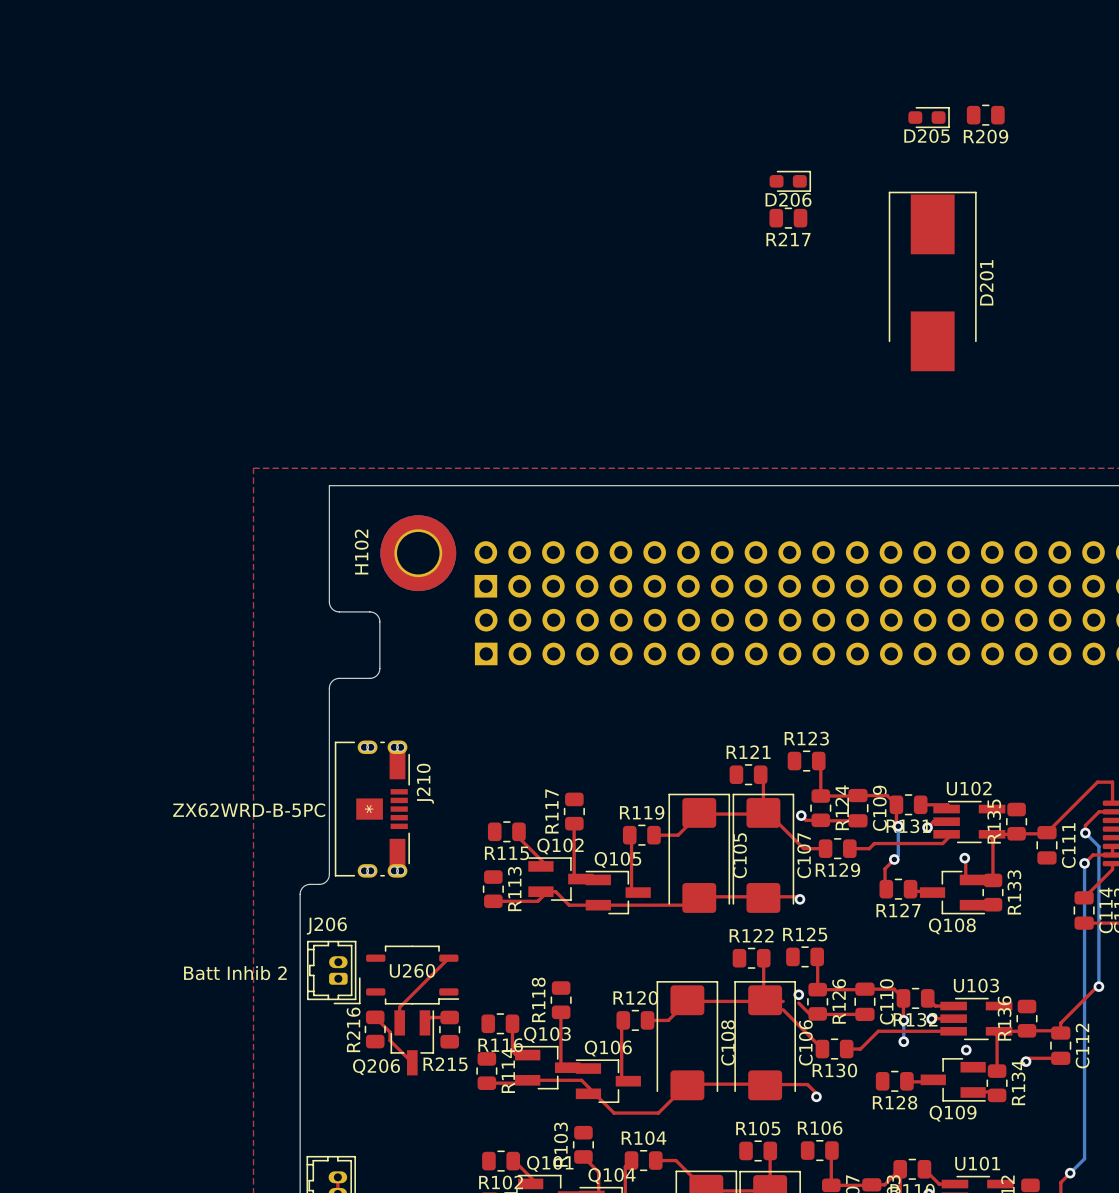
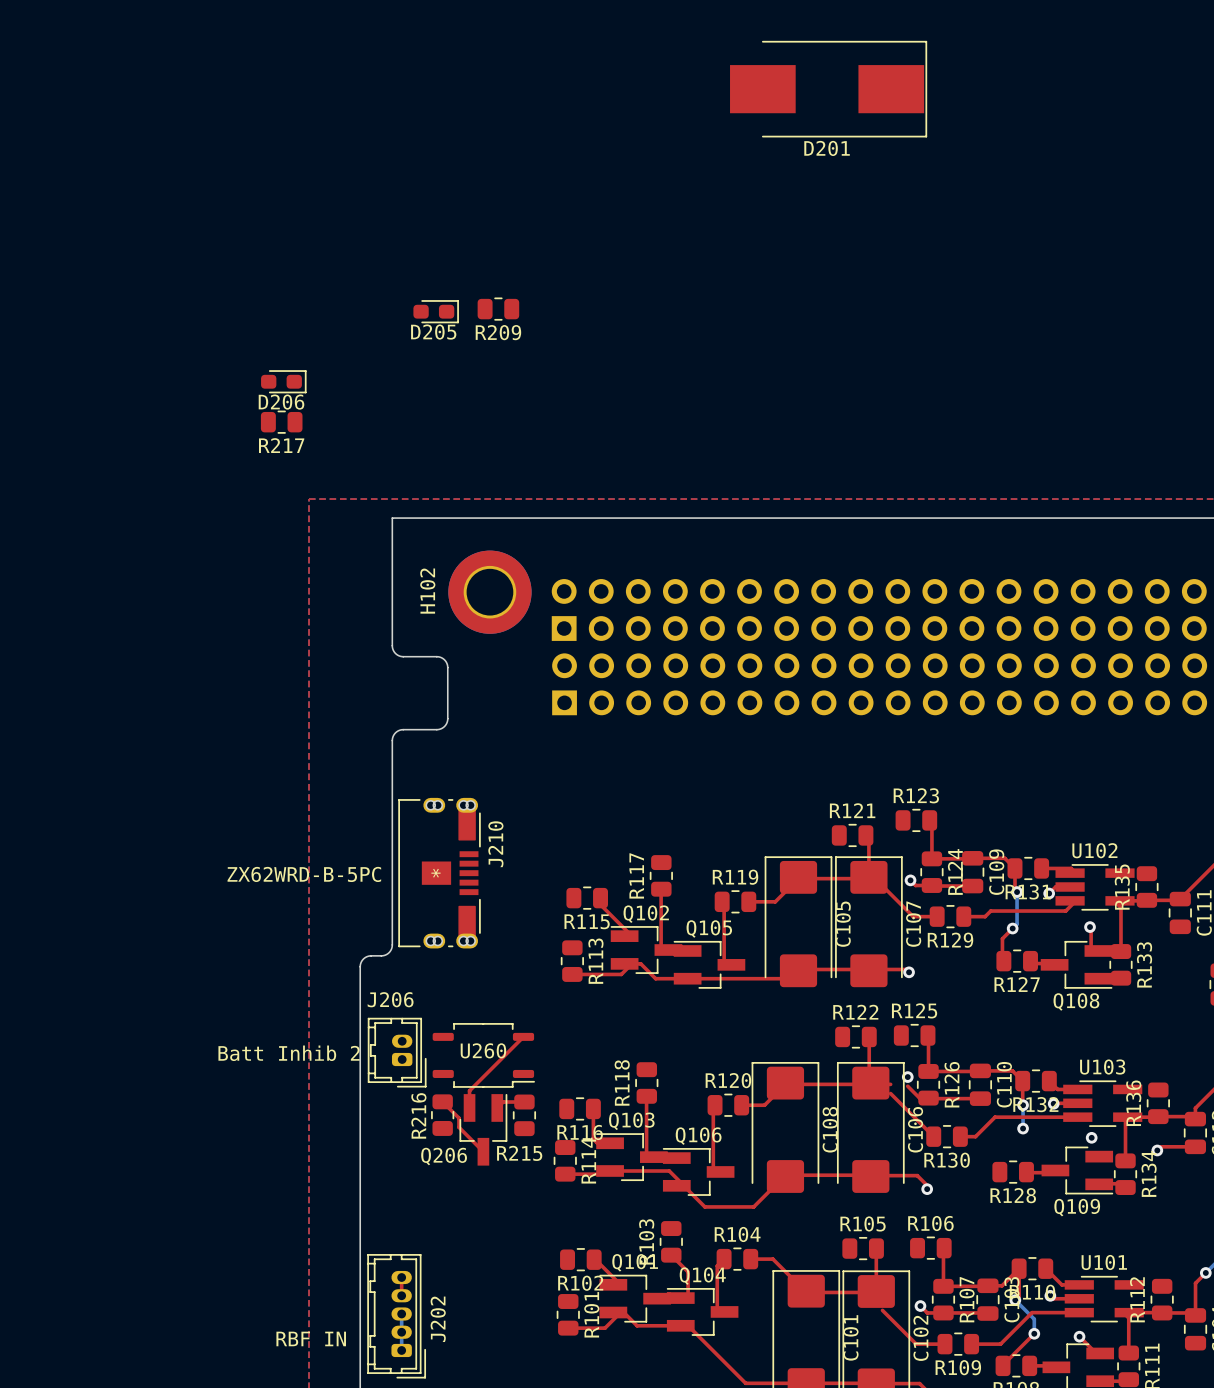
R209 position: (985, 115) -> (498, 309)
D205 position: (929, 117) -> (436, 311)
D206 position: (790, 181) -> (283, 381)
R217 position: (788, 218) -> (281, 422)
D201 rotation: 0° (932, 281) -> 90° clockwise (828, 89)
D201 position: (932, 281) -> (828, 89)

